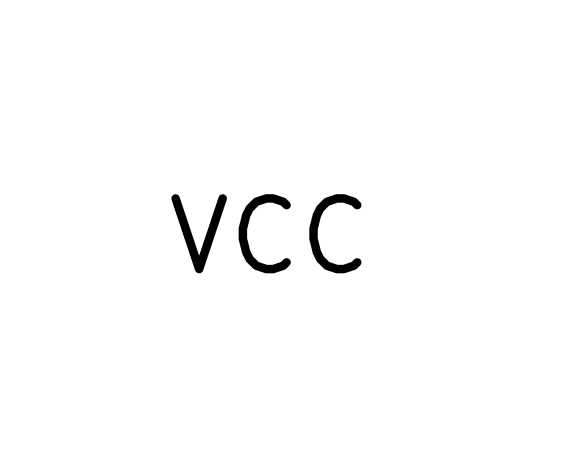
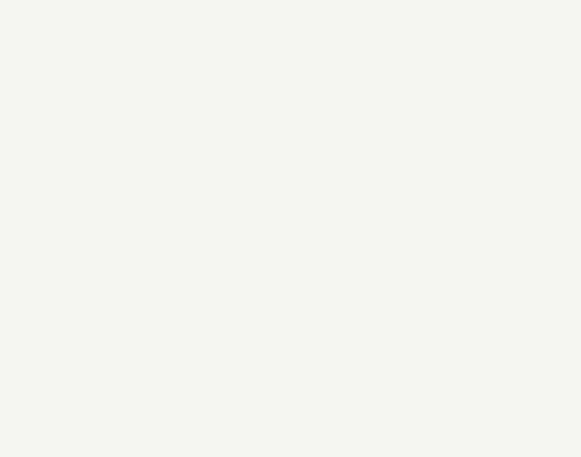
label: VCC (266, 233) -> none

